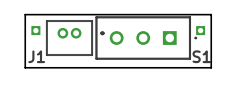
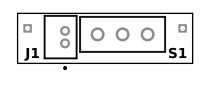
S1 footprint: [95, 16, 197, 60] -> [79, 15, 167, 53]
J1 rotation: 0° (75, 38) -> 90° clockwise (60, 42)

